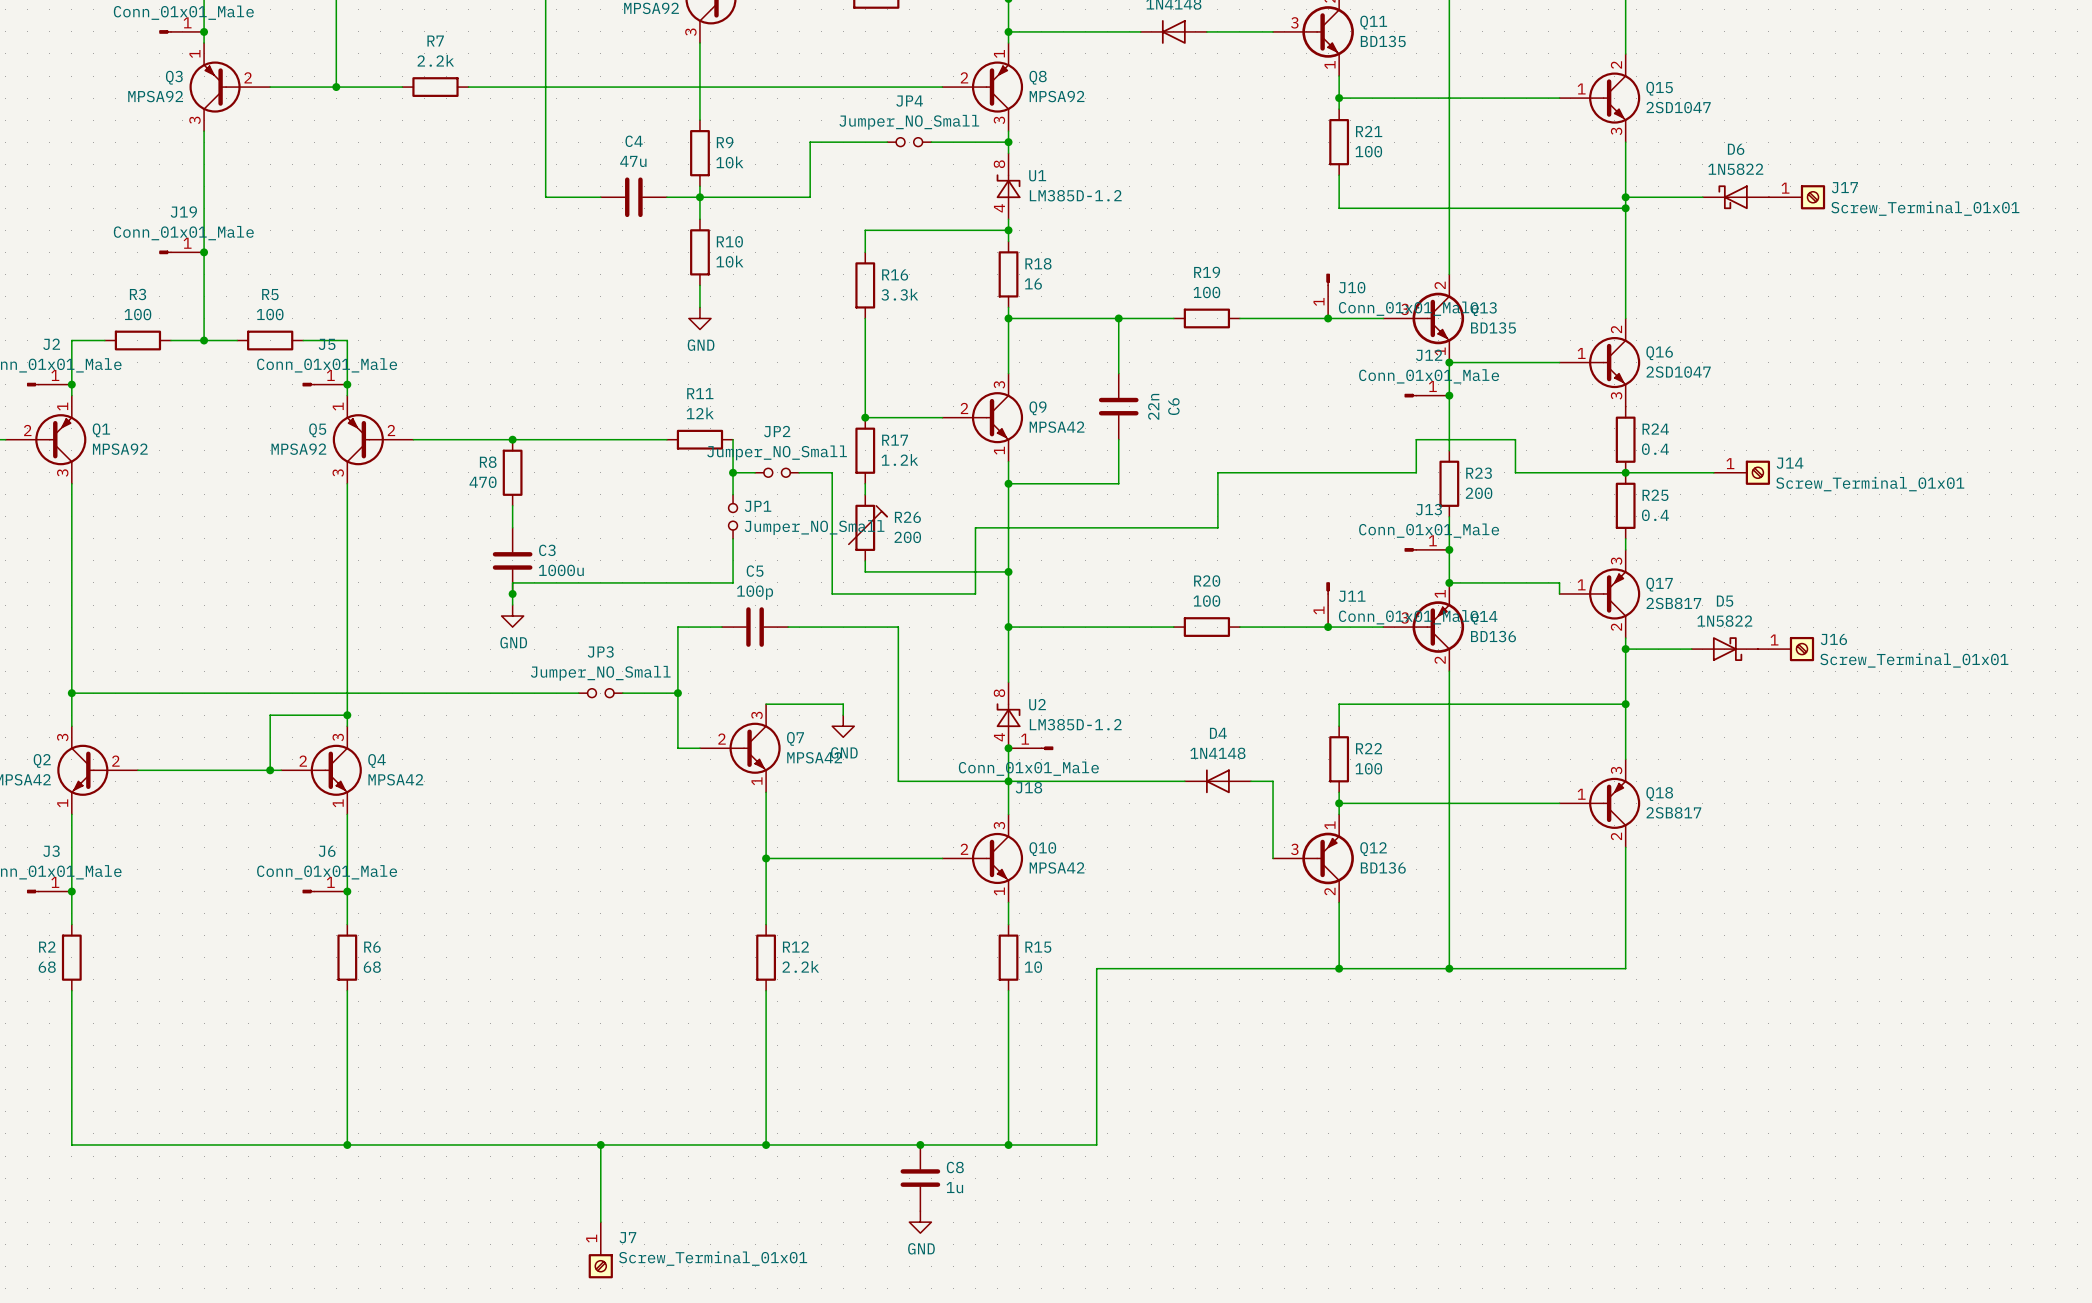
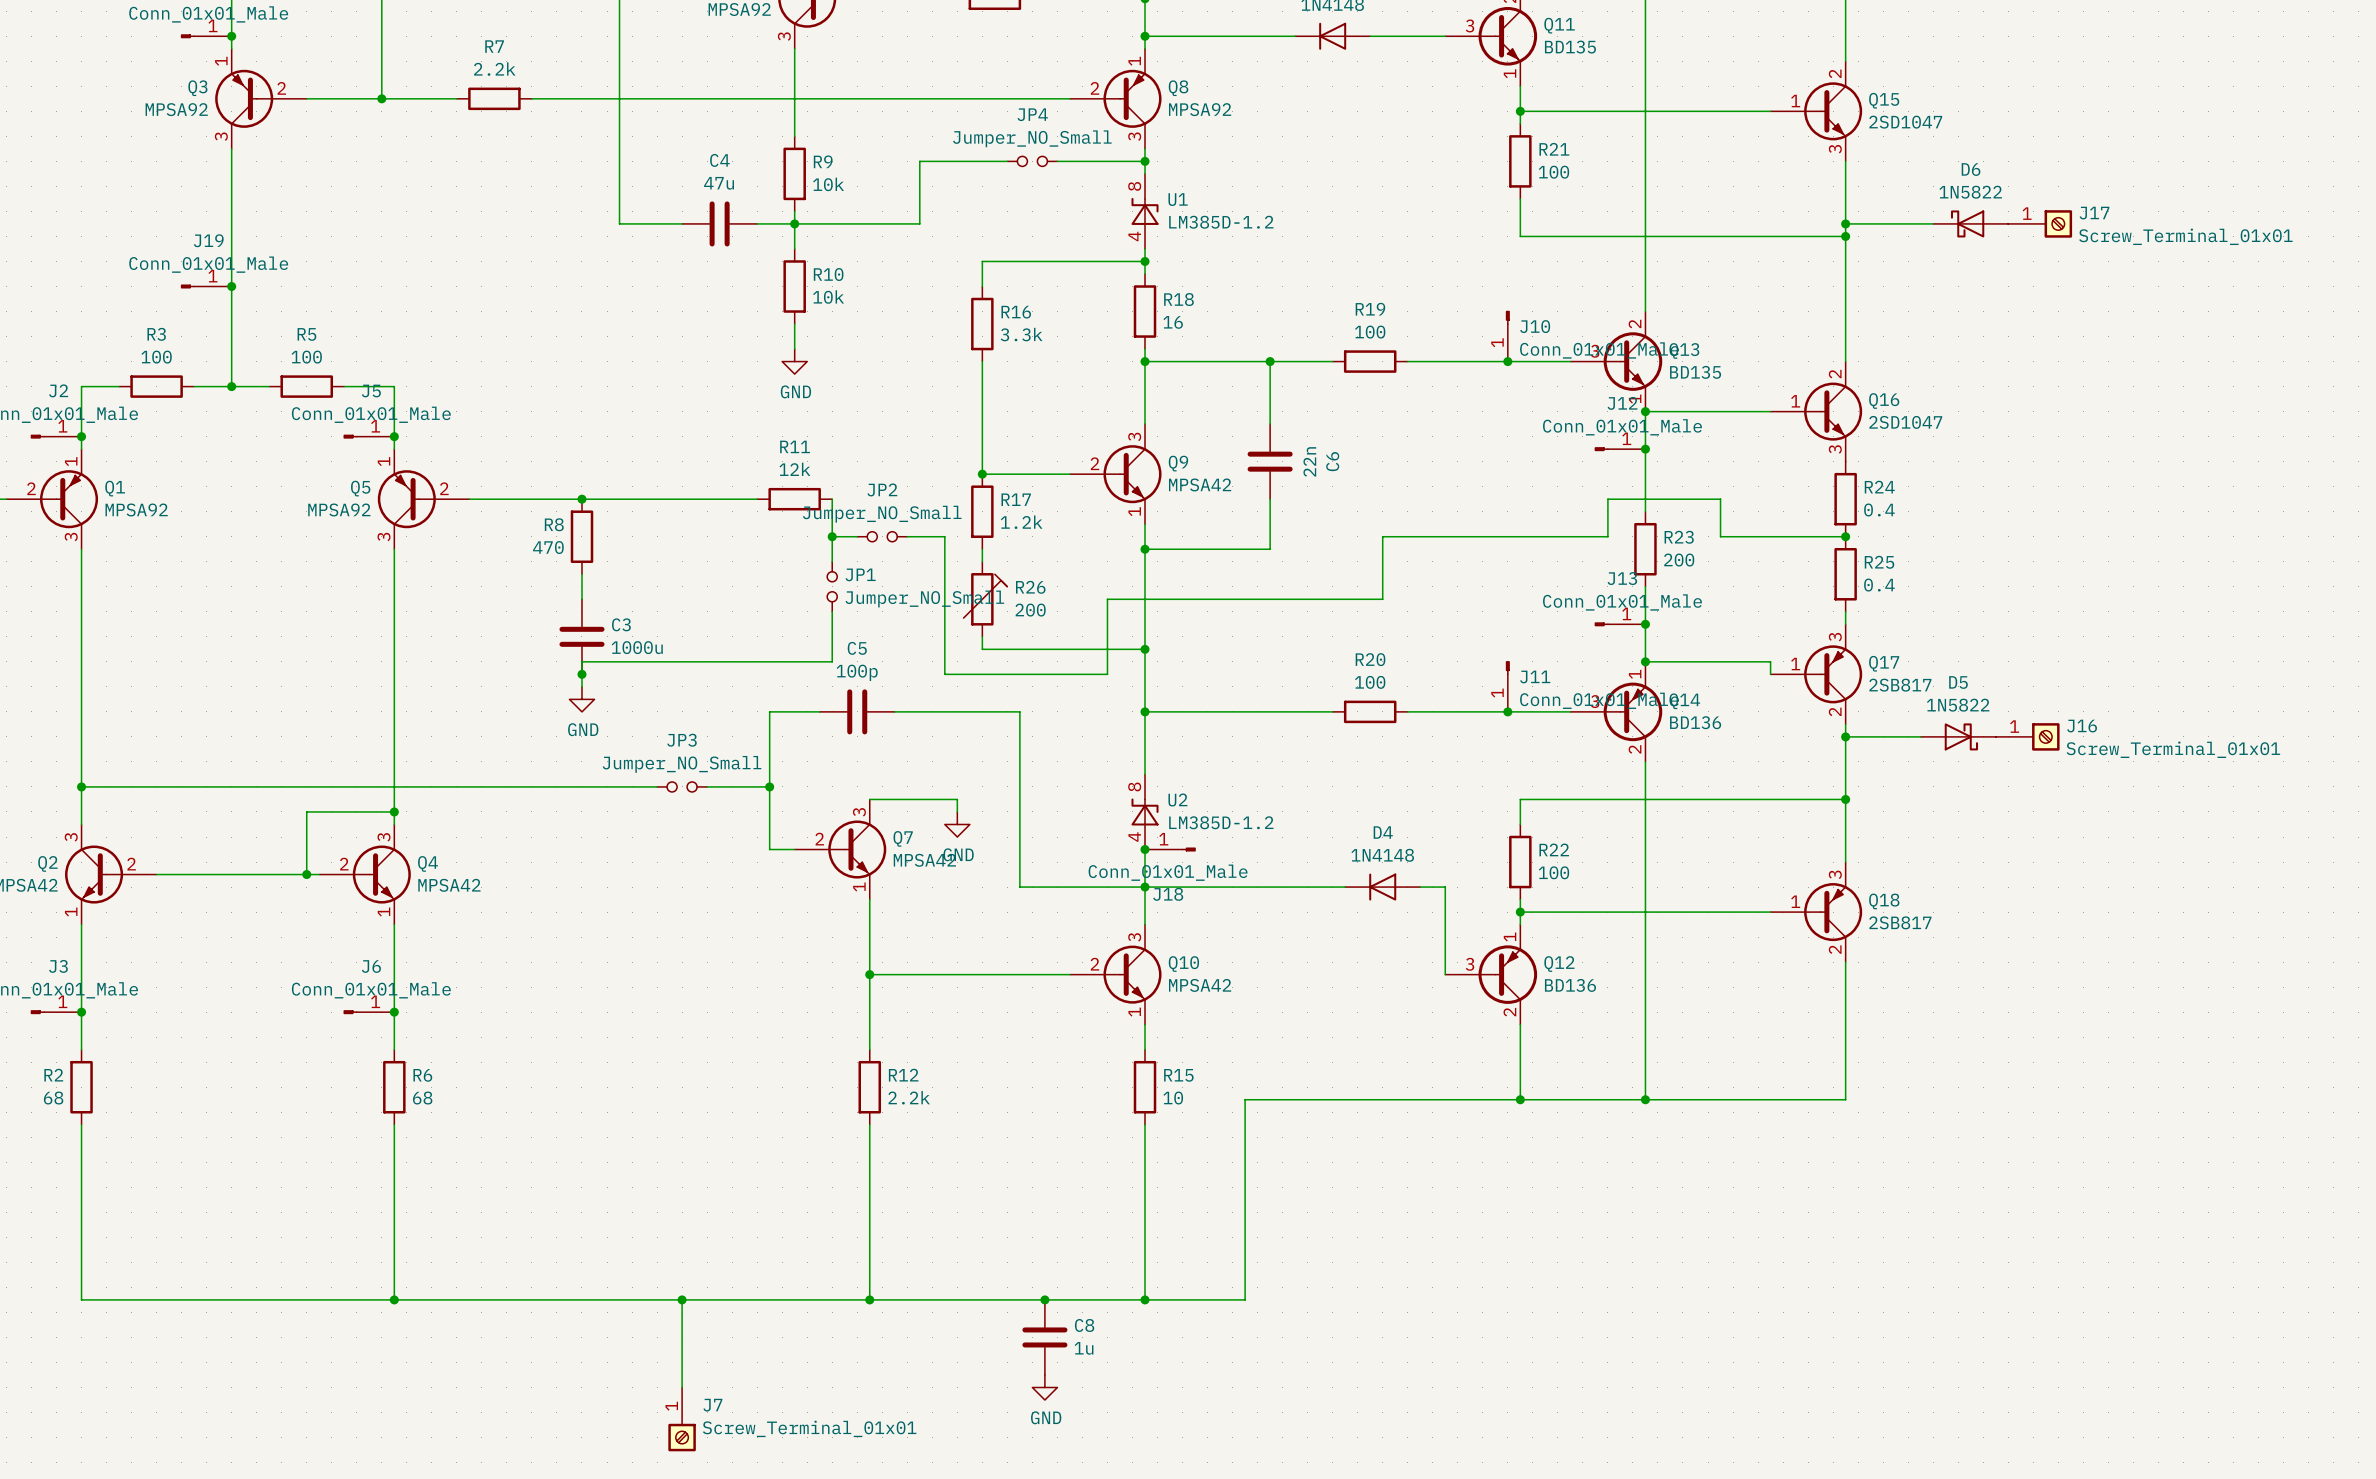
wire: (1625, 472) (1713, 472) -> none
J14: Screw_Terminal_01x01 (1741, 472) -> none

